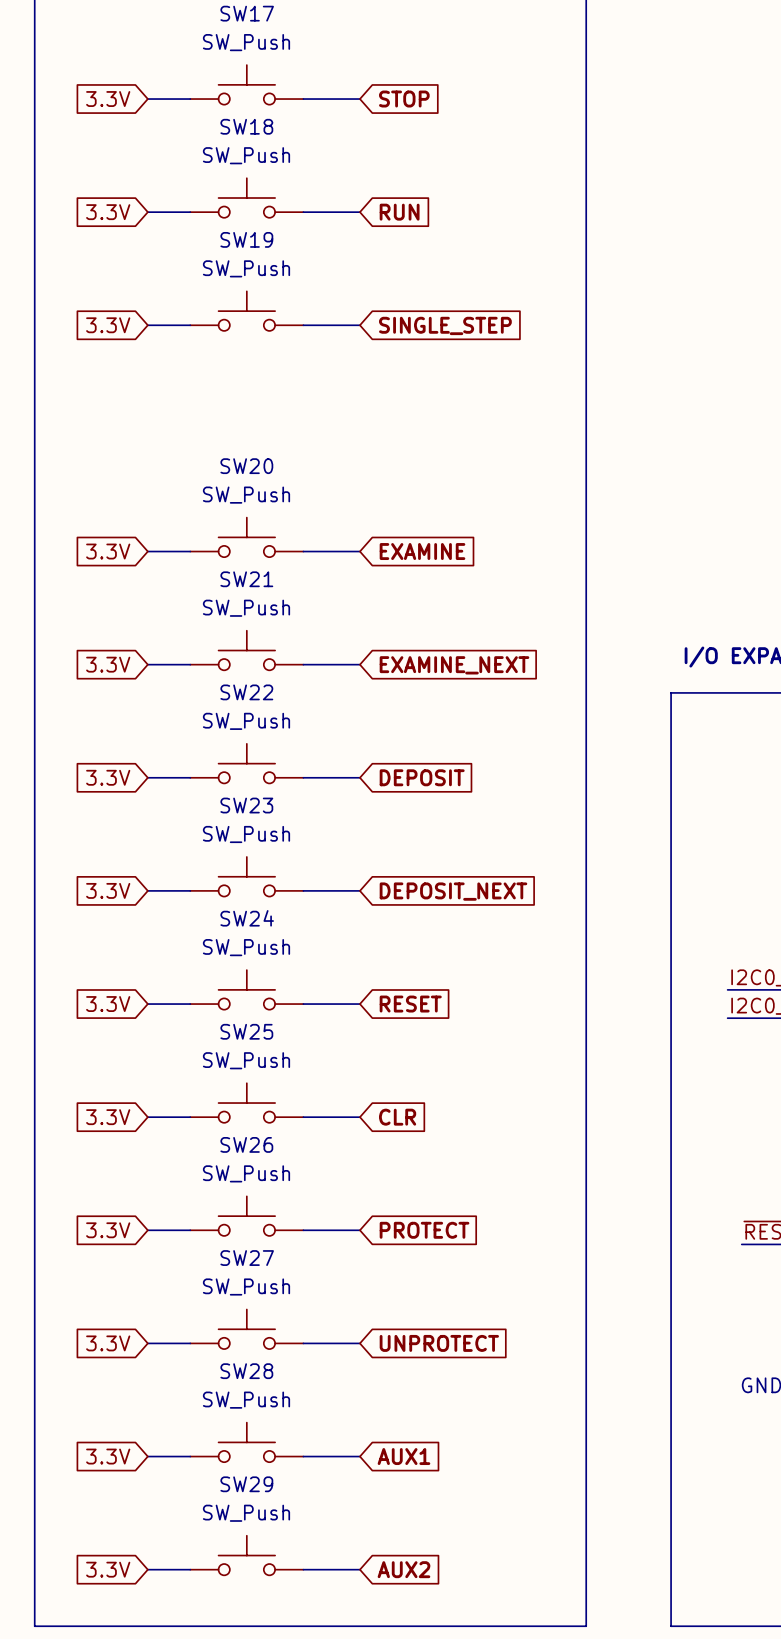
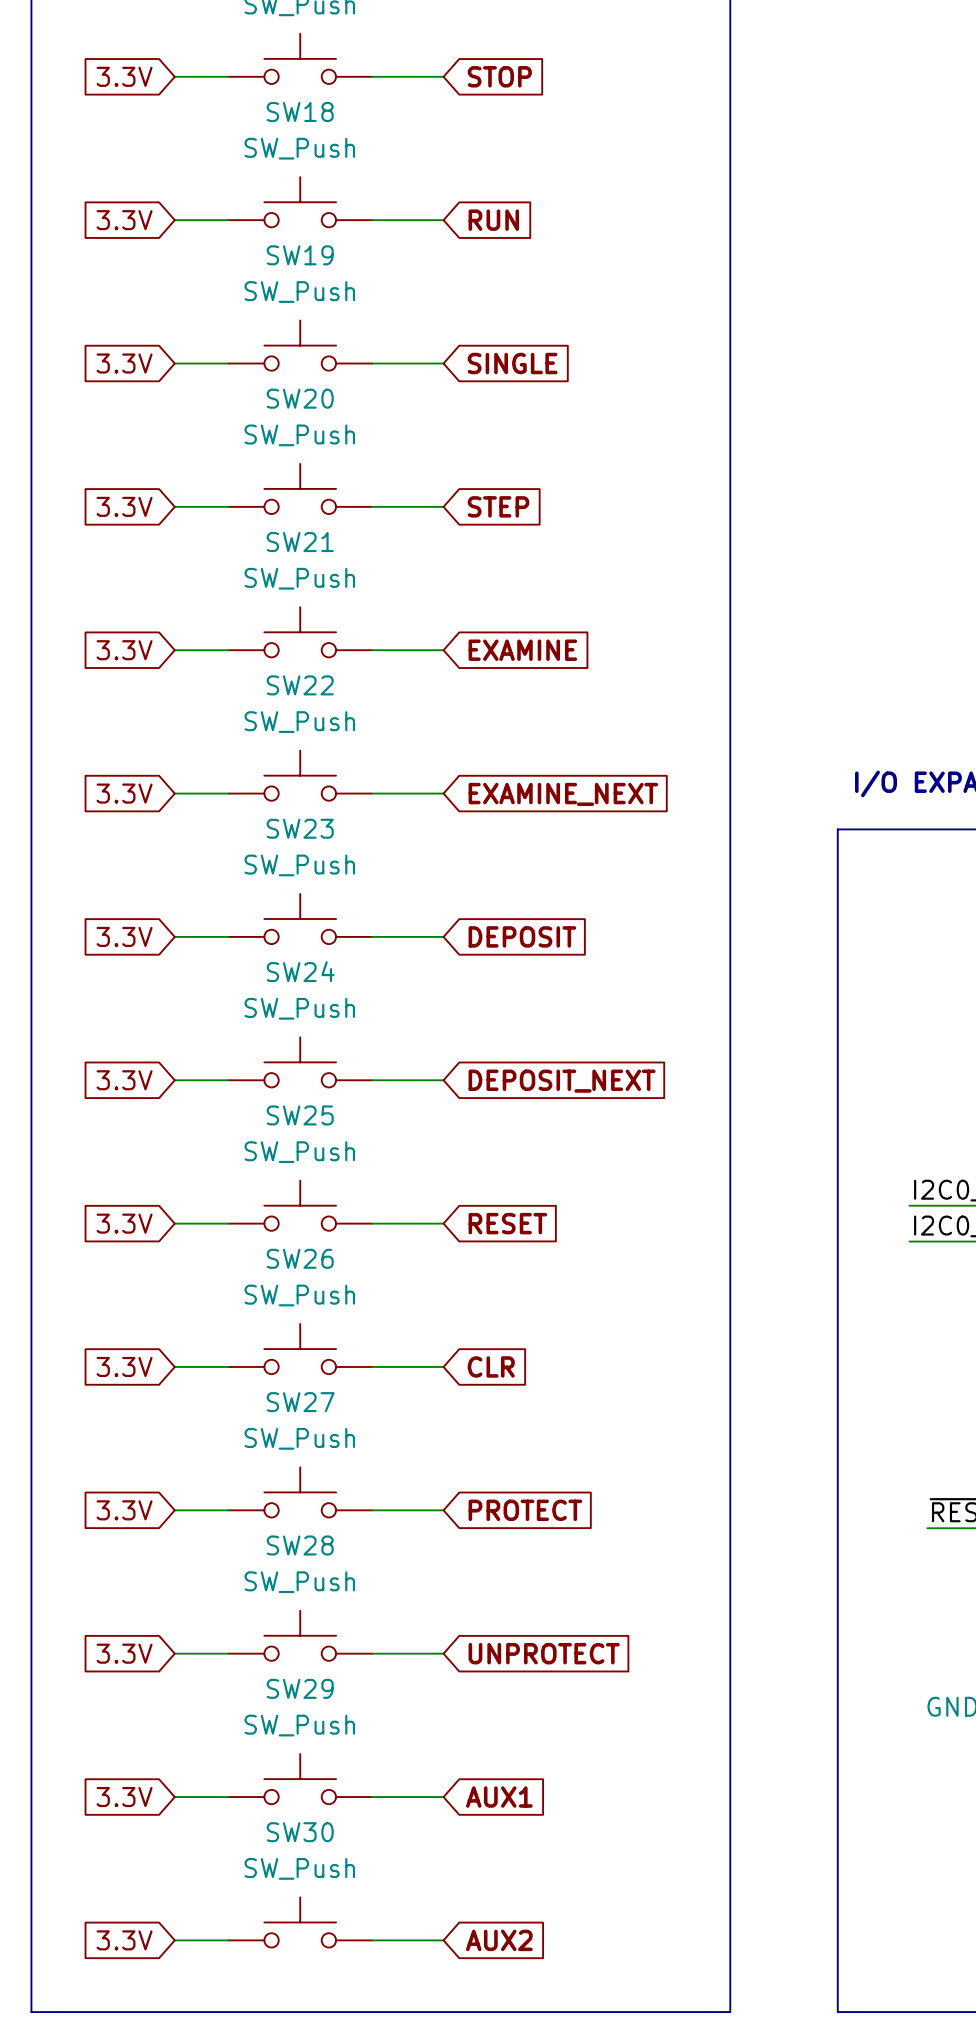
global label: SINGLE_STEP (445, 325) -> SINGLE (512, 363)
SW20: none -> SW_Push (300, 488)
global label: none -> 3.3V (124, 506)
wire: none -> (174, 506) (228, 506)
wire: none -> (371, 506) (443, 506)
global label: none -> STEP (498, 506)
SW20 name: SW20 (246, 466) -> SW21 (300, 542)
SW21 name: SW21 (246, 579) -> SW22 (300, 685)
SW22 name: SW22 (246, 692) -> SW23 (300, 828)
SW23 name: SW23 (246, 805) -> SW24 (300, 971)
SW24 name: SW24 (247, 918) -> SW25 (300, 1115)
SW25 name: SW25 (246, 1031) -> SW26 (300, 1258)
SW26 name: SW26 (246, 1144) -> SW27 (300, 1402)
SW27 name: SW27 (247, 1258) -> SW28 (300, 1545)
SW28 name: SW28 (246, 1371) -> SW29 (300, 1688)
SW29 name: SW29 (246, 1484) -> SW30 (300, 1832)

